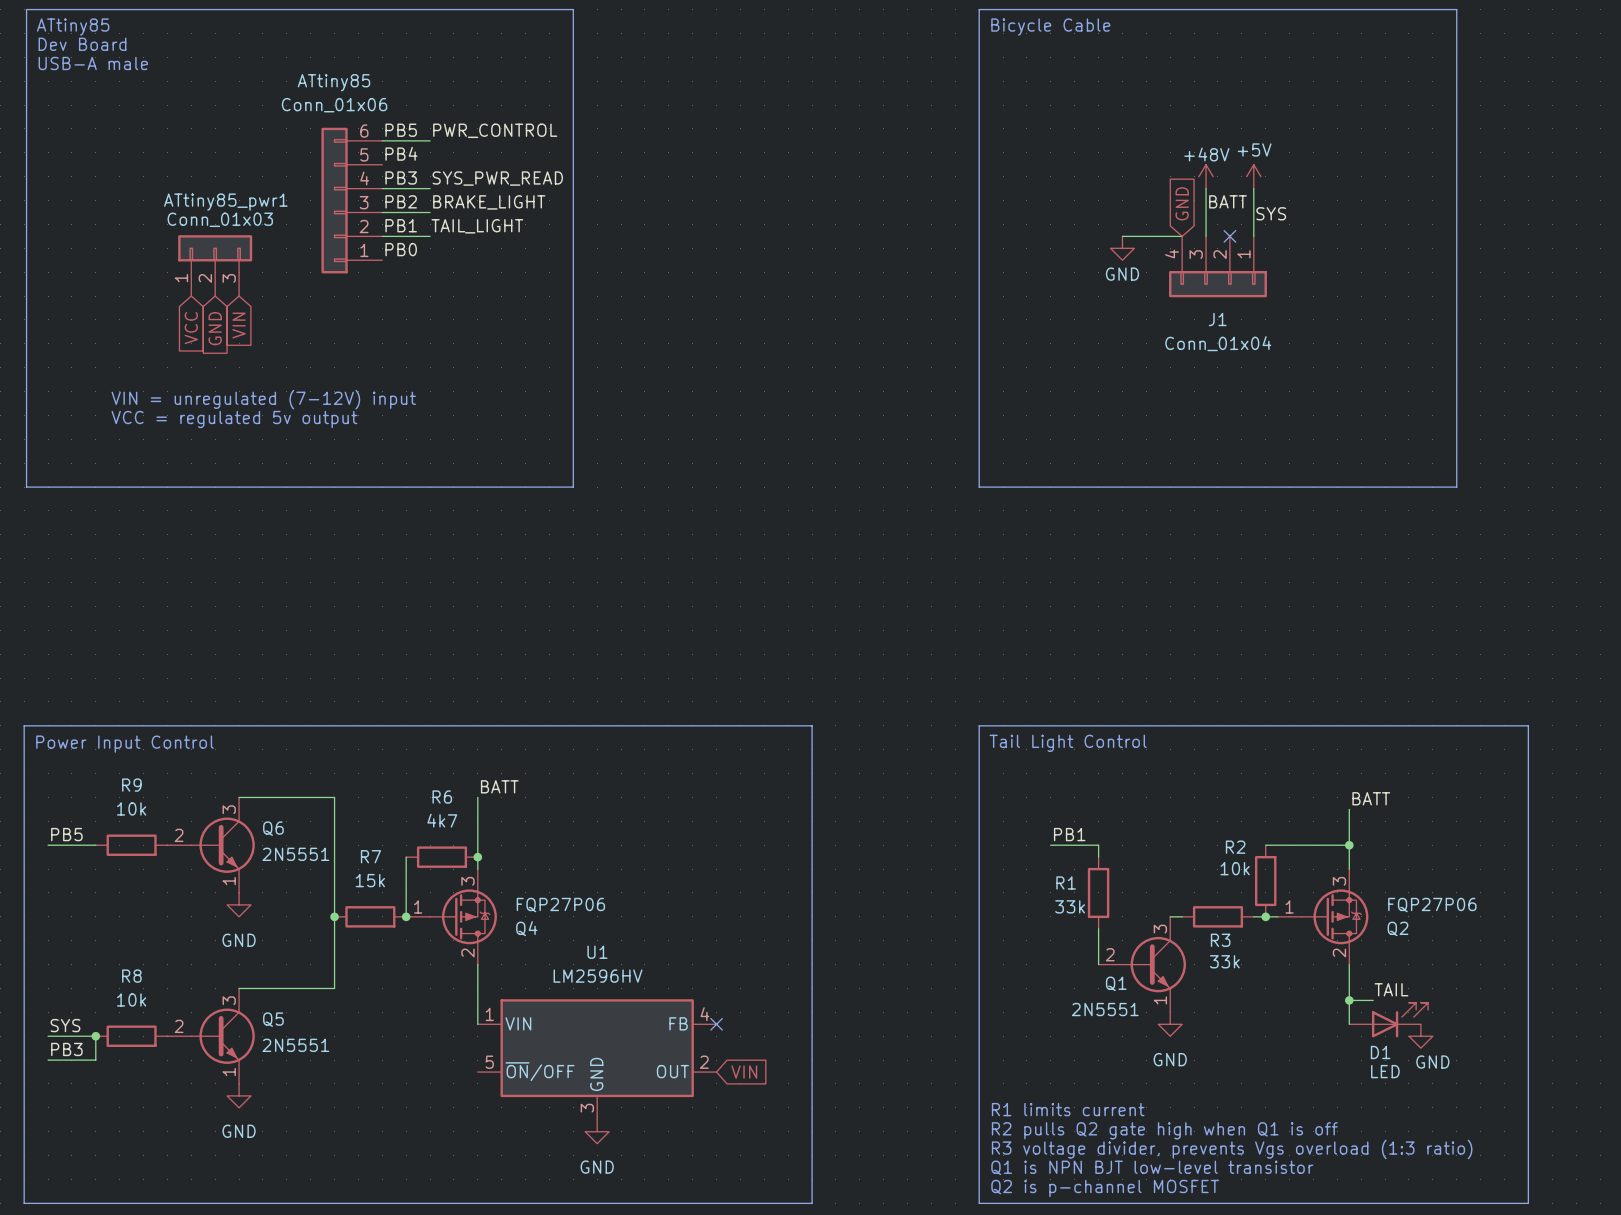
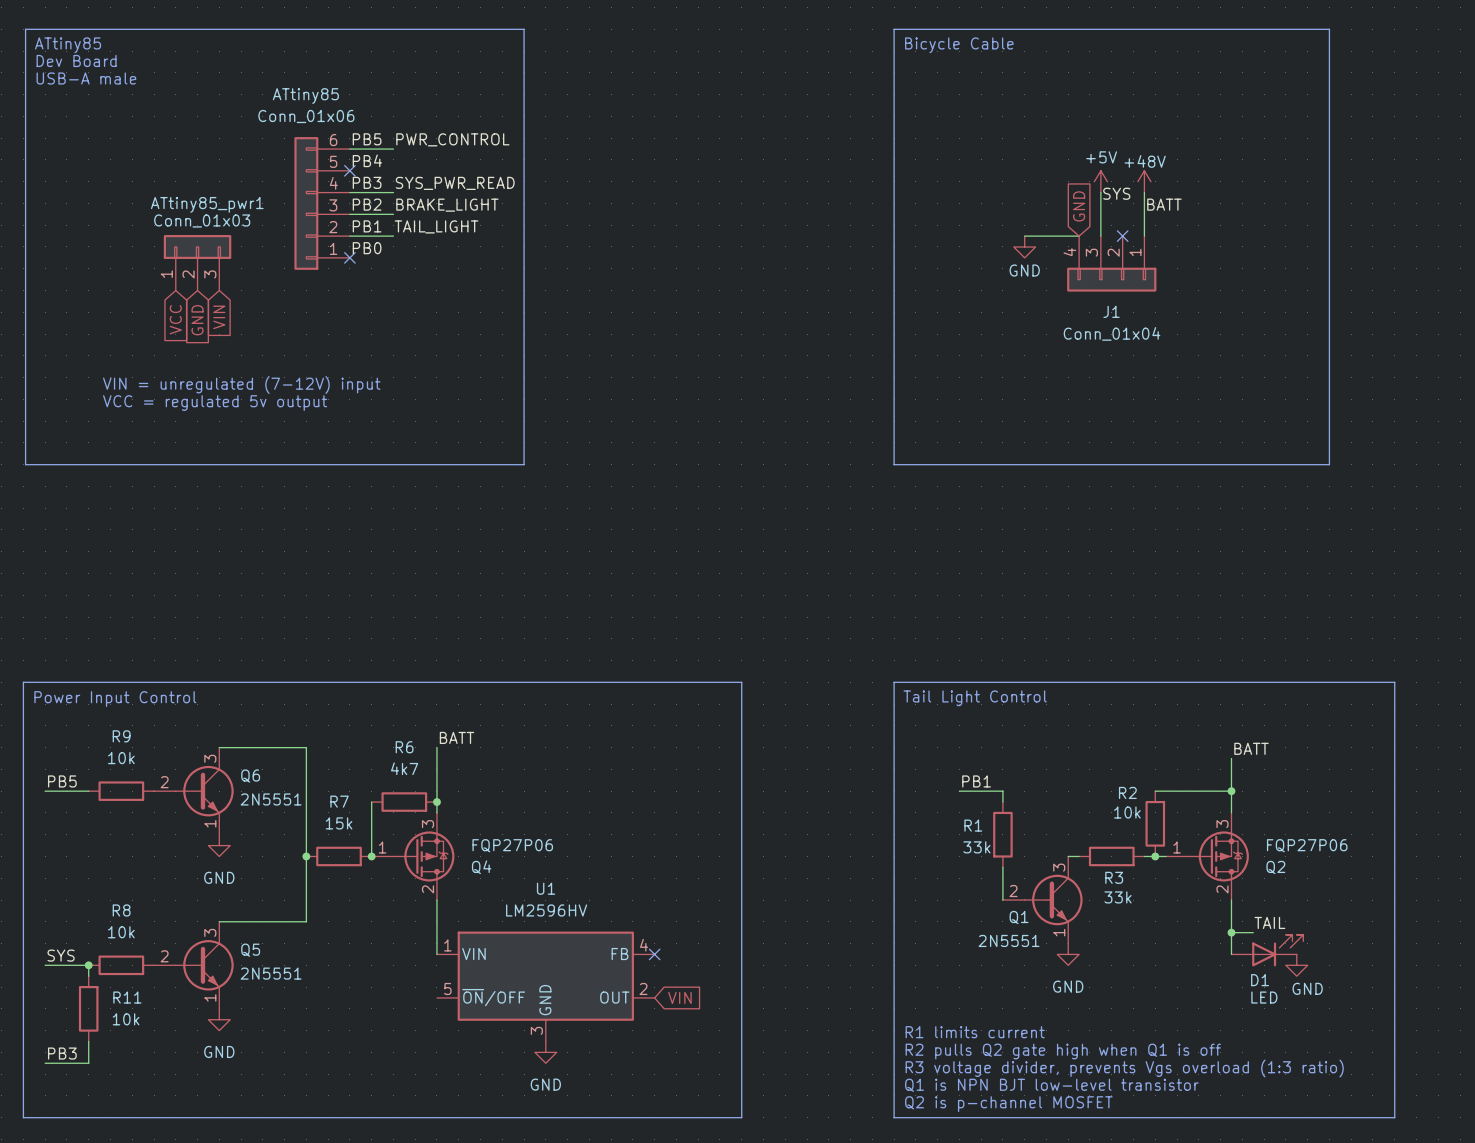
no-connect mark: none -> (349, 170)
power symbol: +48V (1206, 176) -> +5V (1100, 181)
power symbol: +5V (1253, 176) -> +48V (1144, 181)
label position: BATT (1228, 201) -> BATT (1164, 204)
label position: SYS (1271, 213) -> SYS (1116, 193)
no-connect mark: none -> (349, 257)
wire: (95, 1048) (95, 1060) (48, 1060) -> none
label position: PB3 (66, 1049) -> PB3 (62, 1053)
R11: none -> 10k (88, 1008)
wire: none -> (88, 1041) (88, 1063) (45, 1063)

